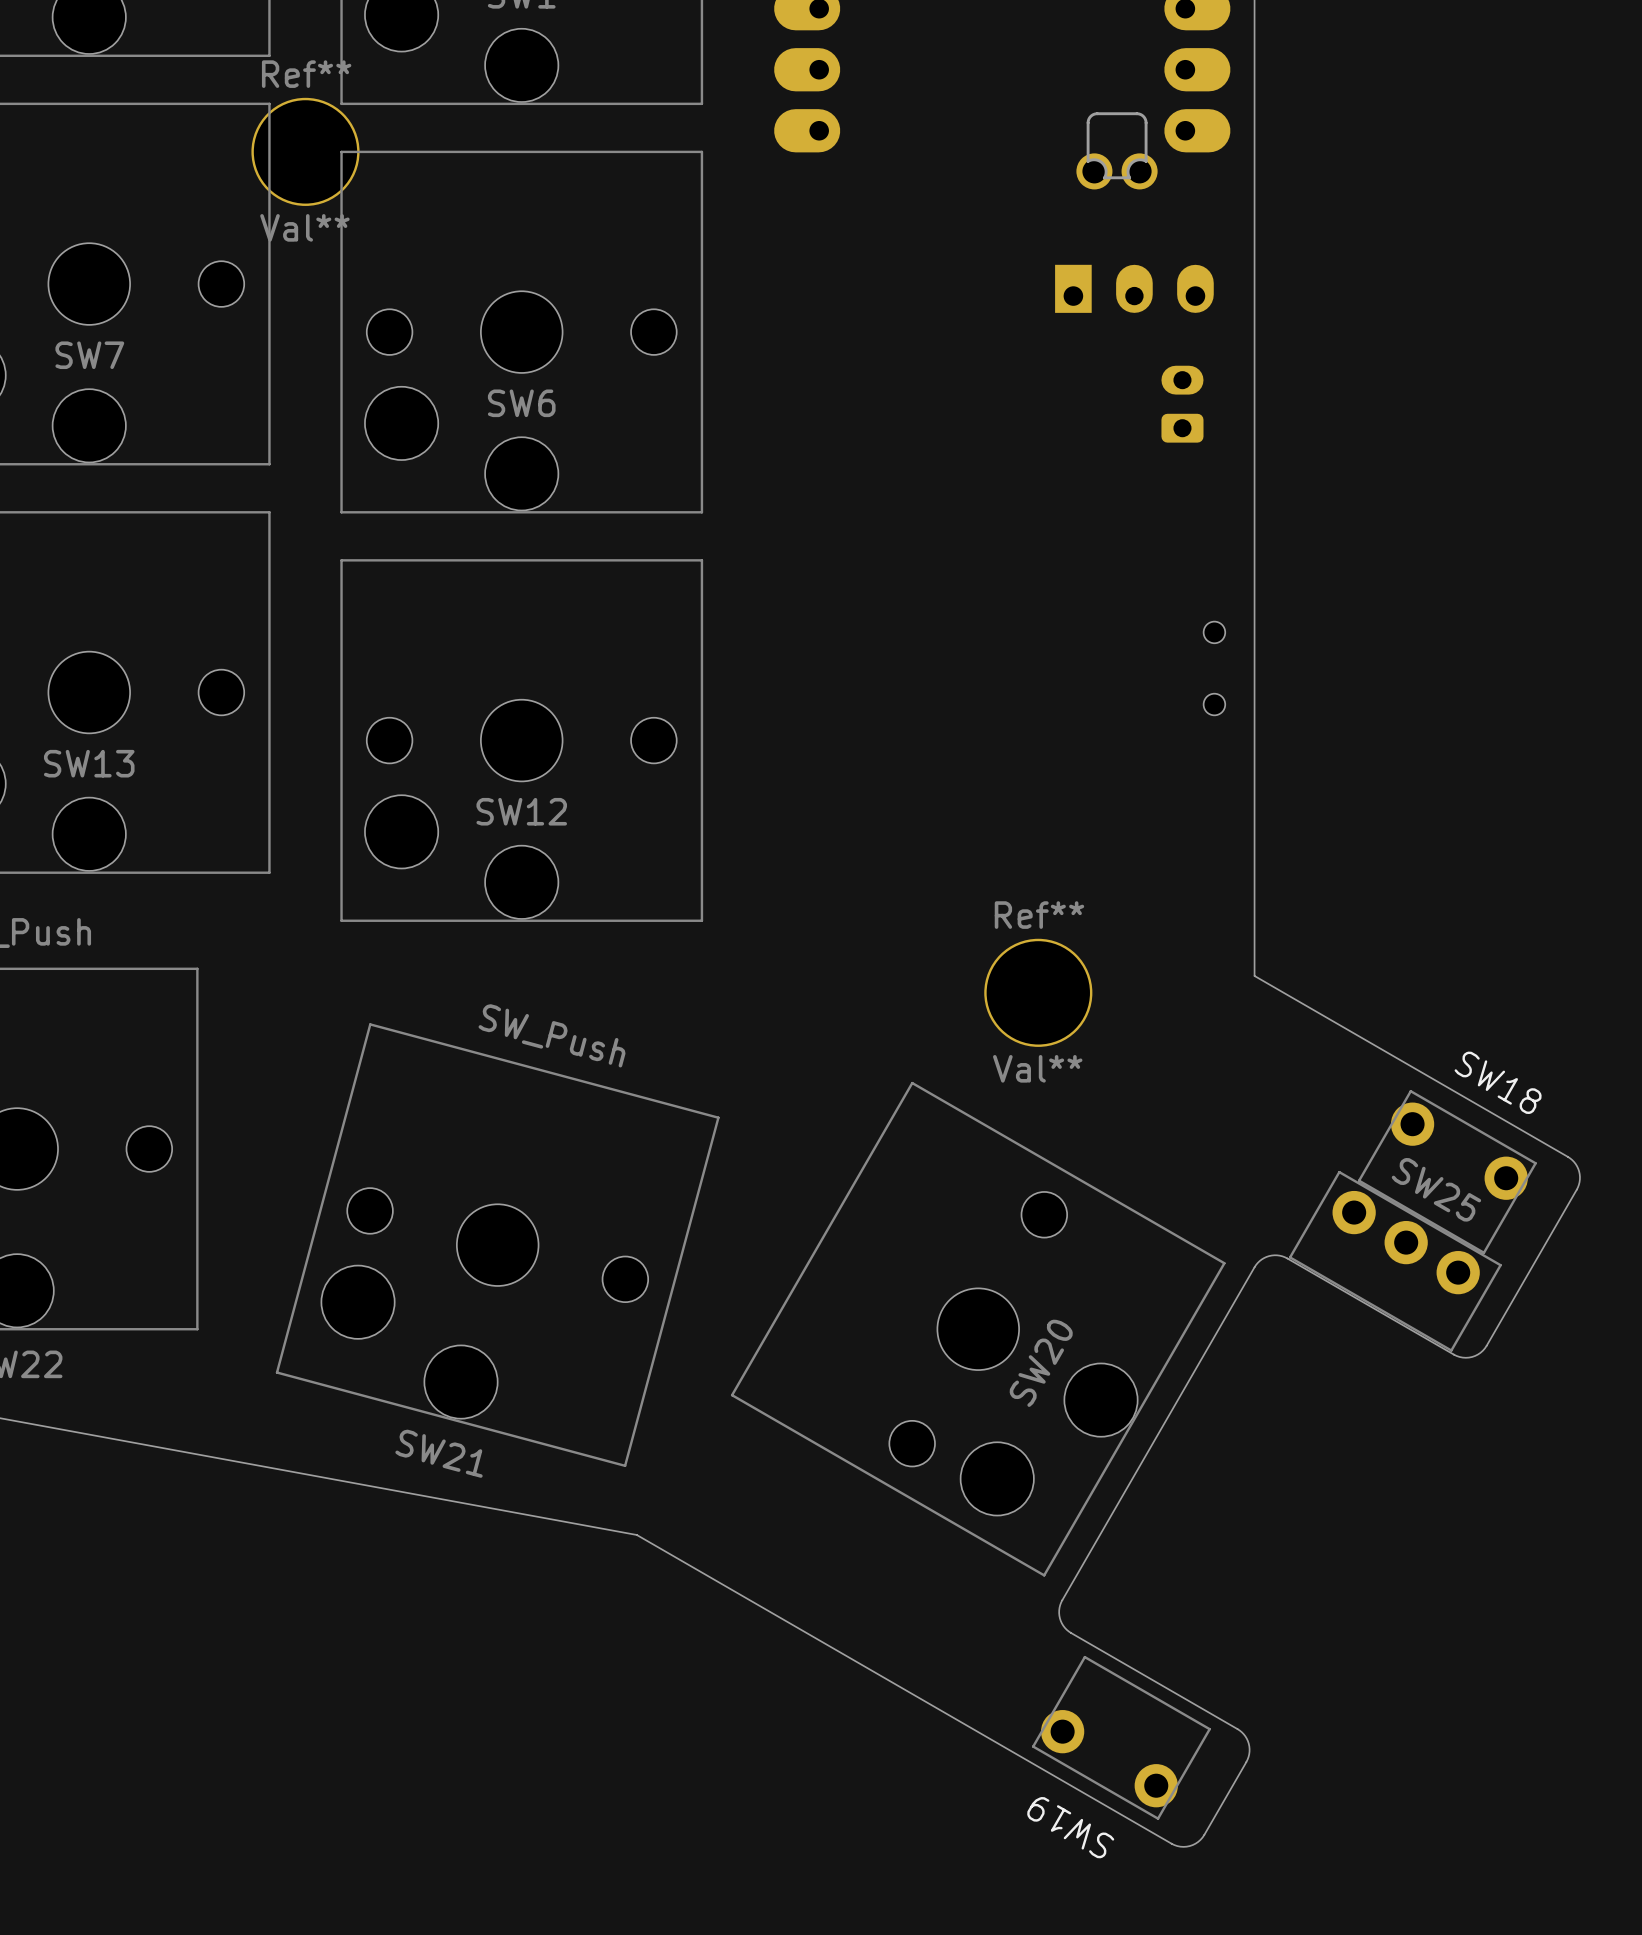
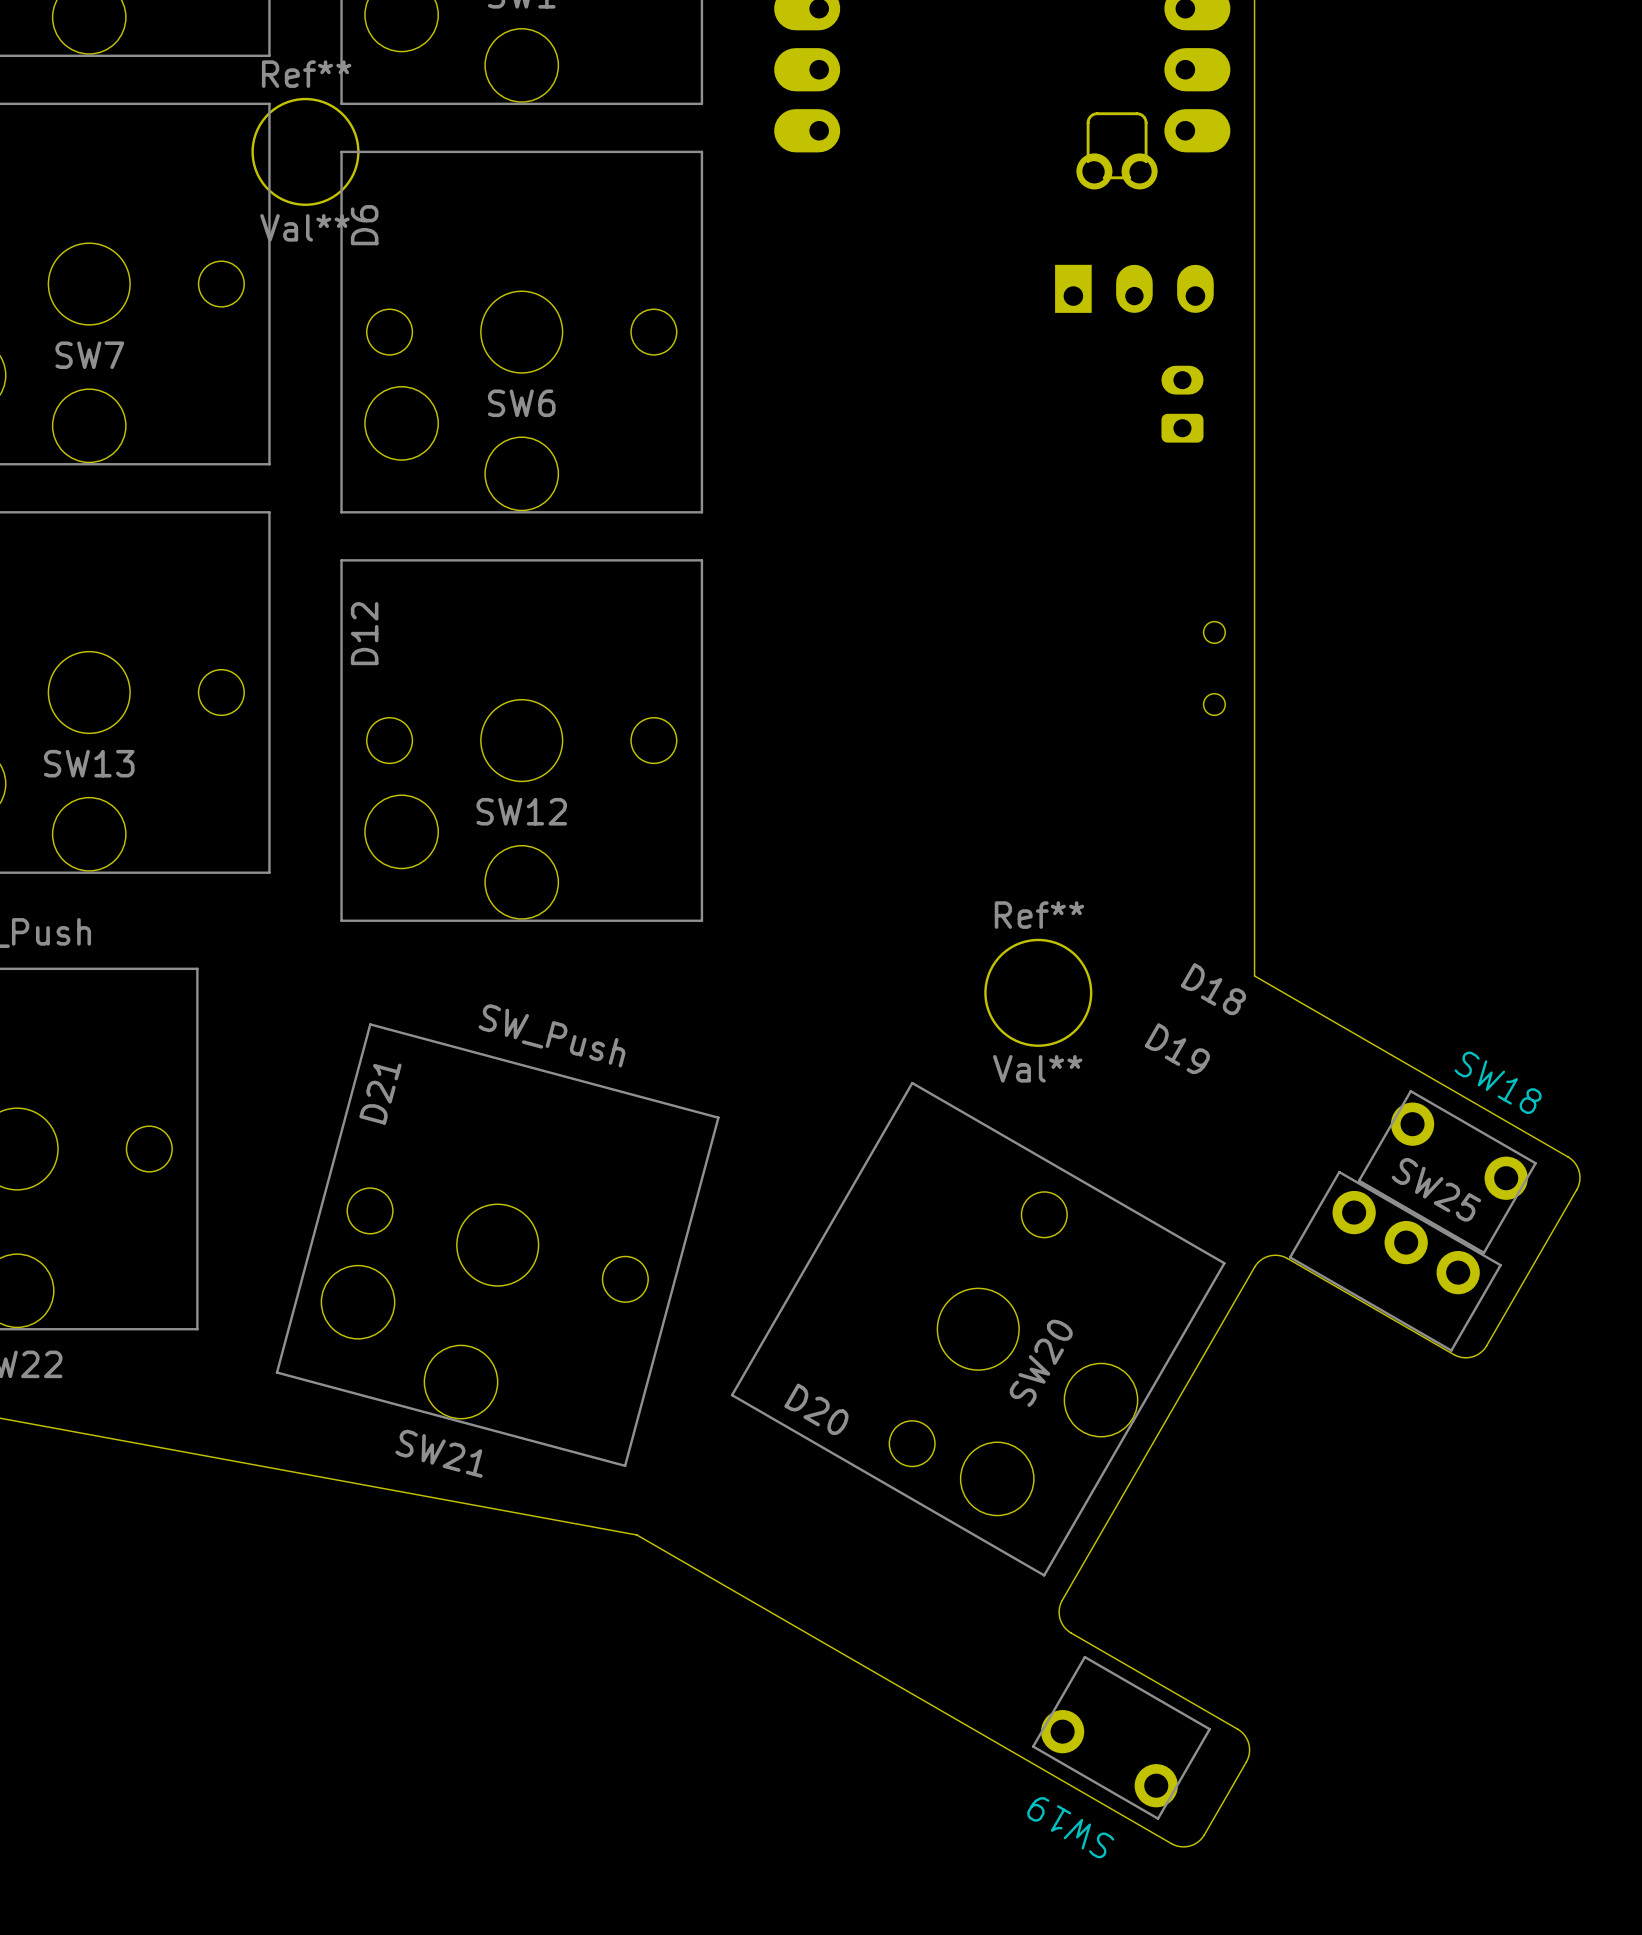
D6: none -> (364, 225)
D12: none -> (364, 633)
D18: none -> (1213, 989)
D19: none -> (1177, 1048)
D21: none -> (380, 1094)
D20: none -> (816, 1409)

